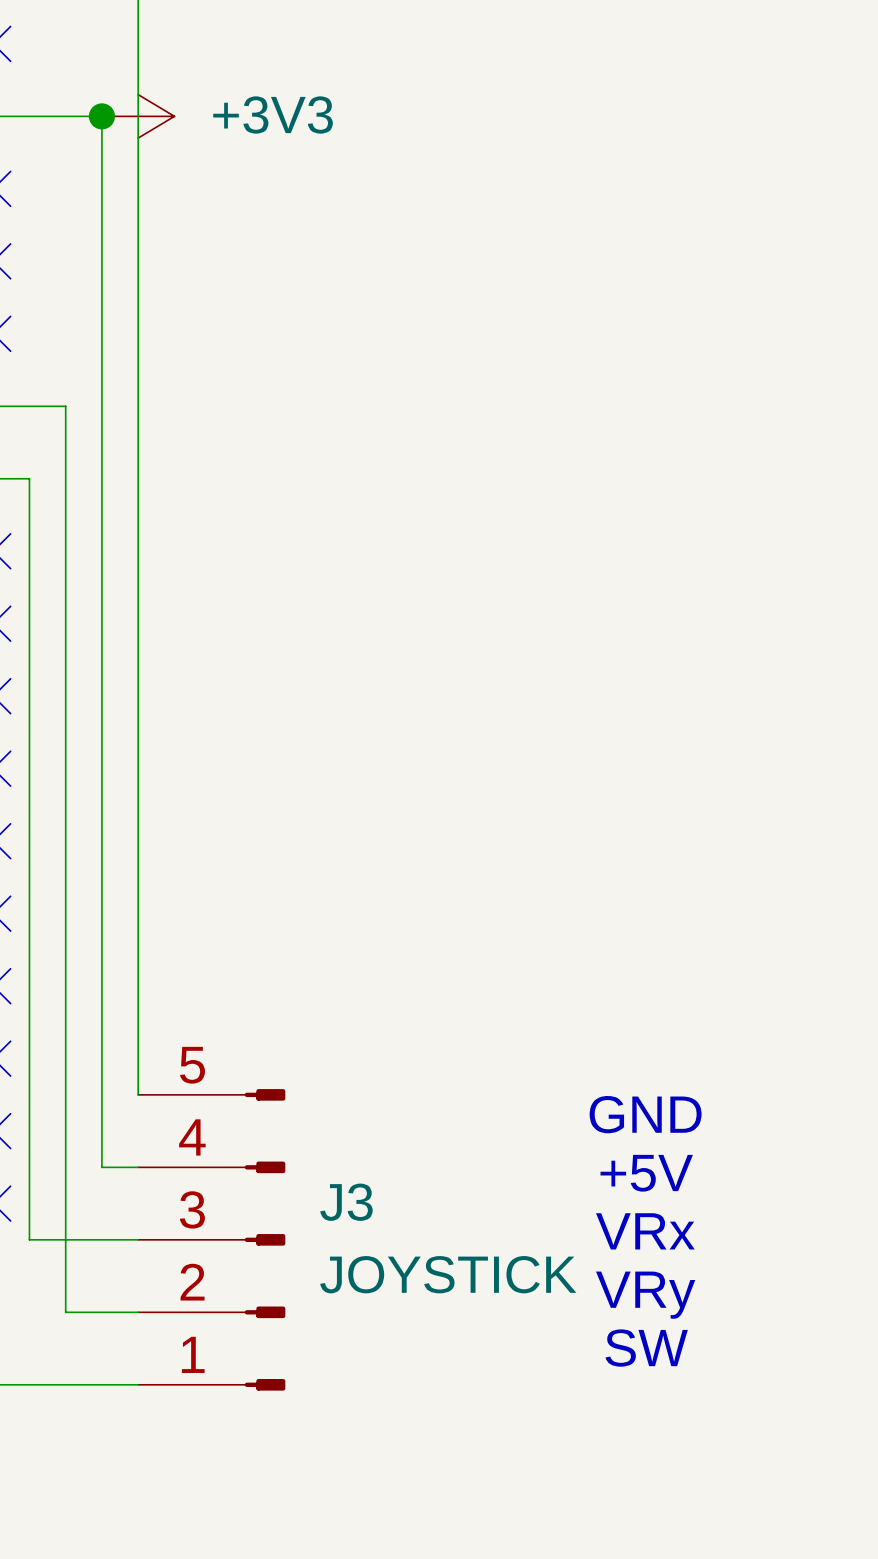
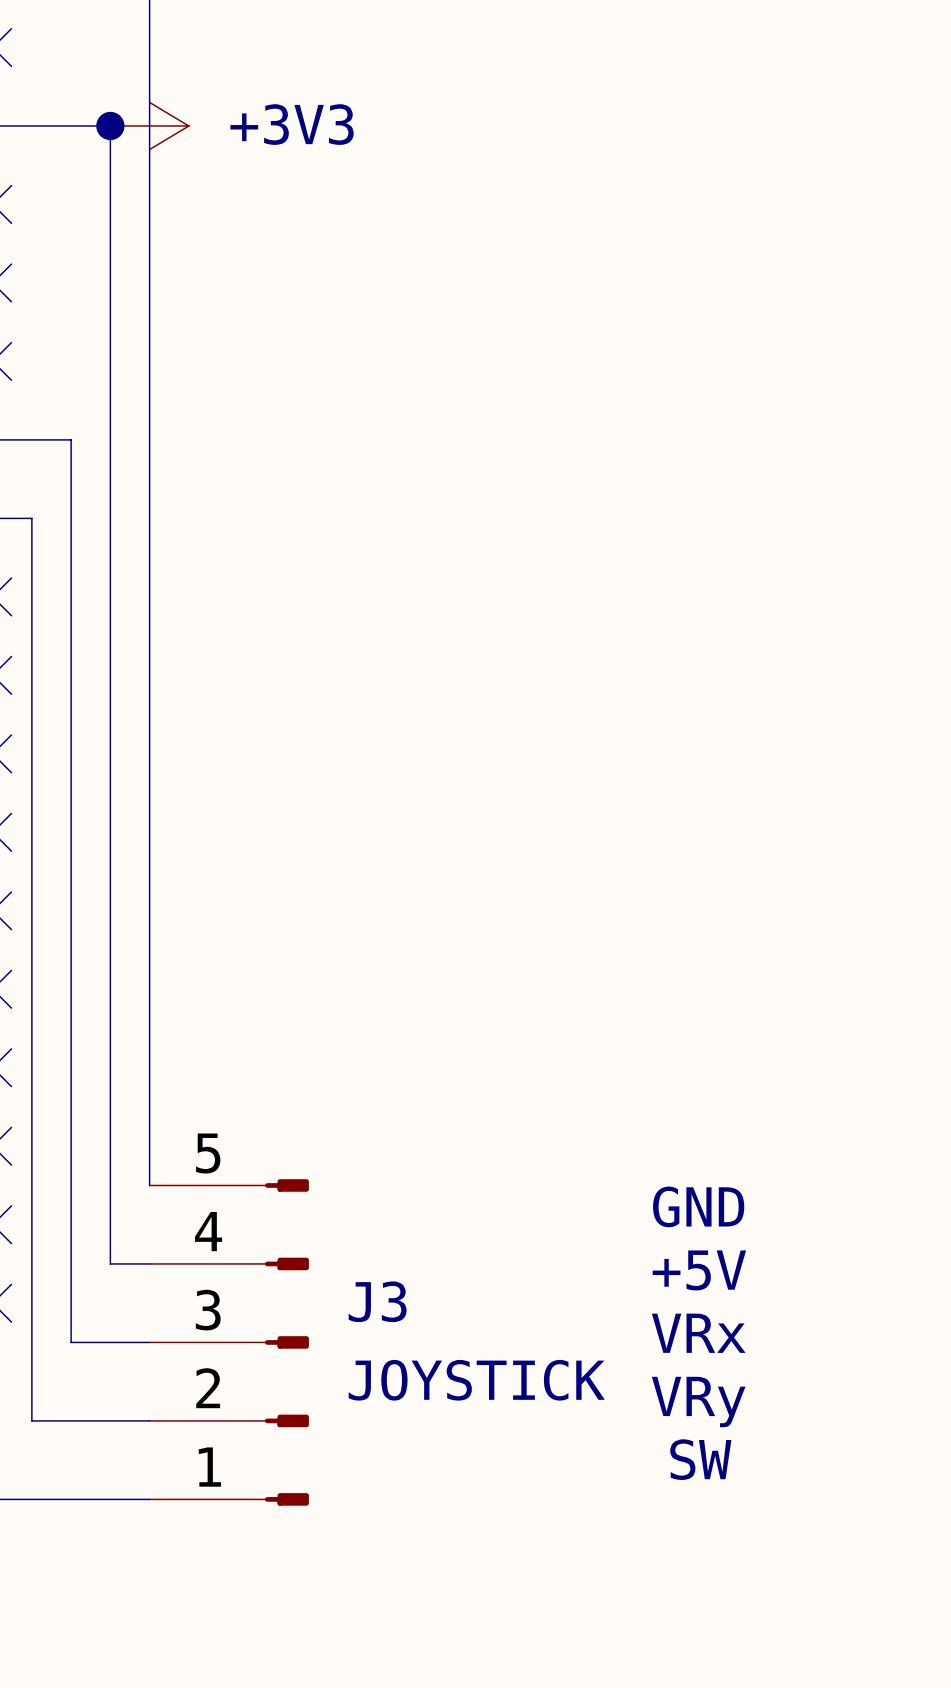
wire: (29, 1239) (65, 1239) (65, 1312) -> (31, 1342) (31, 1420) (71, 1420)

